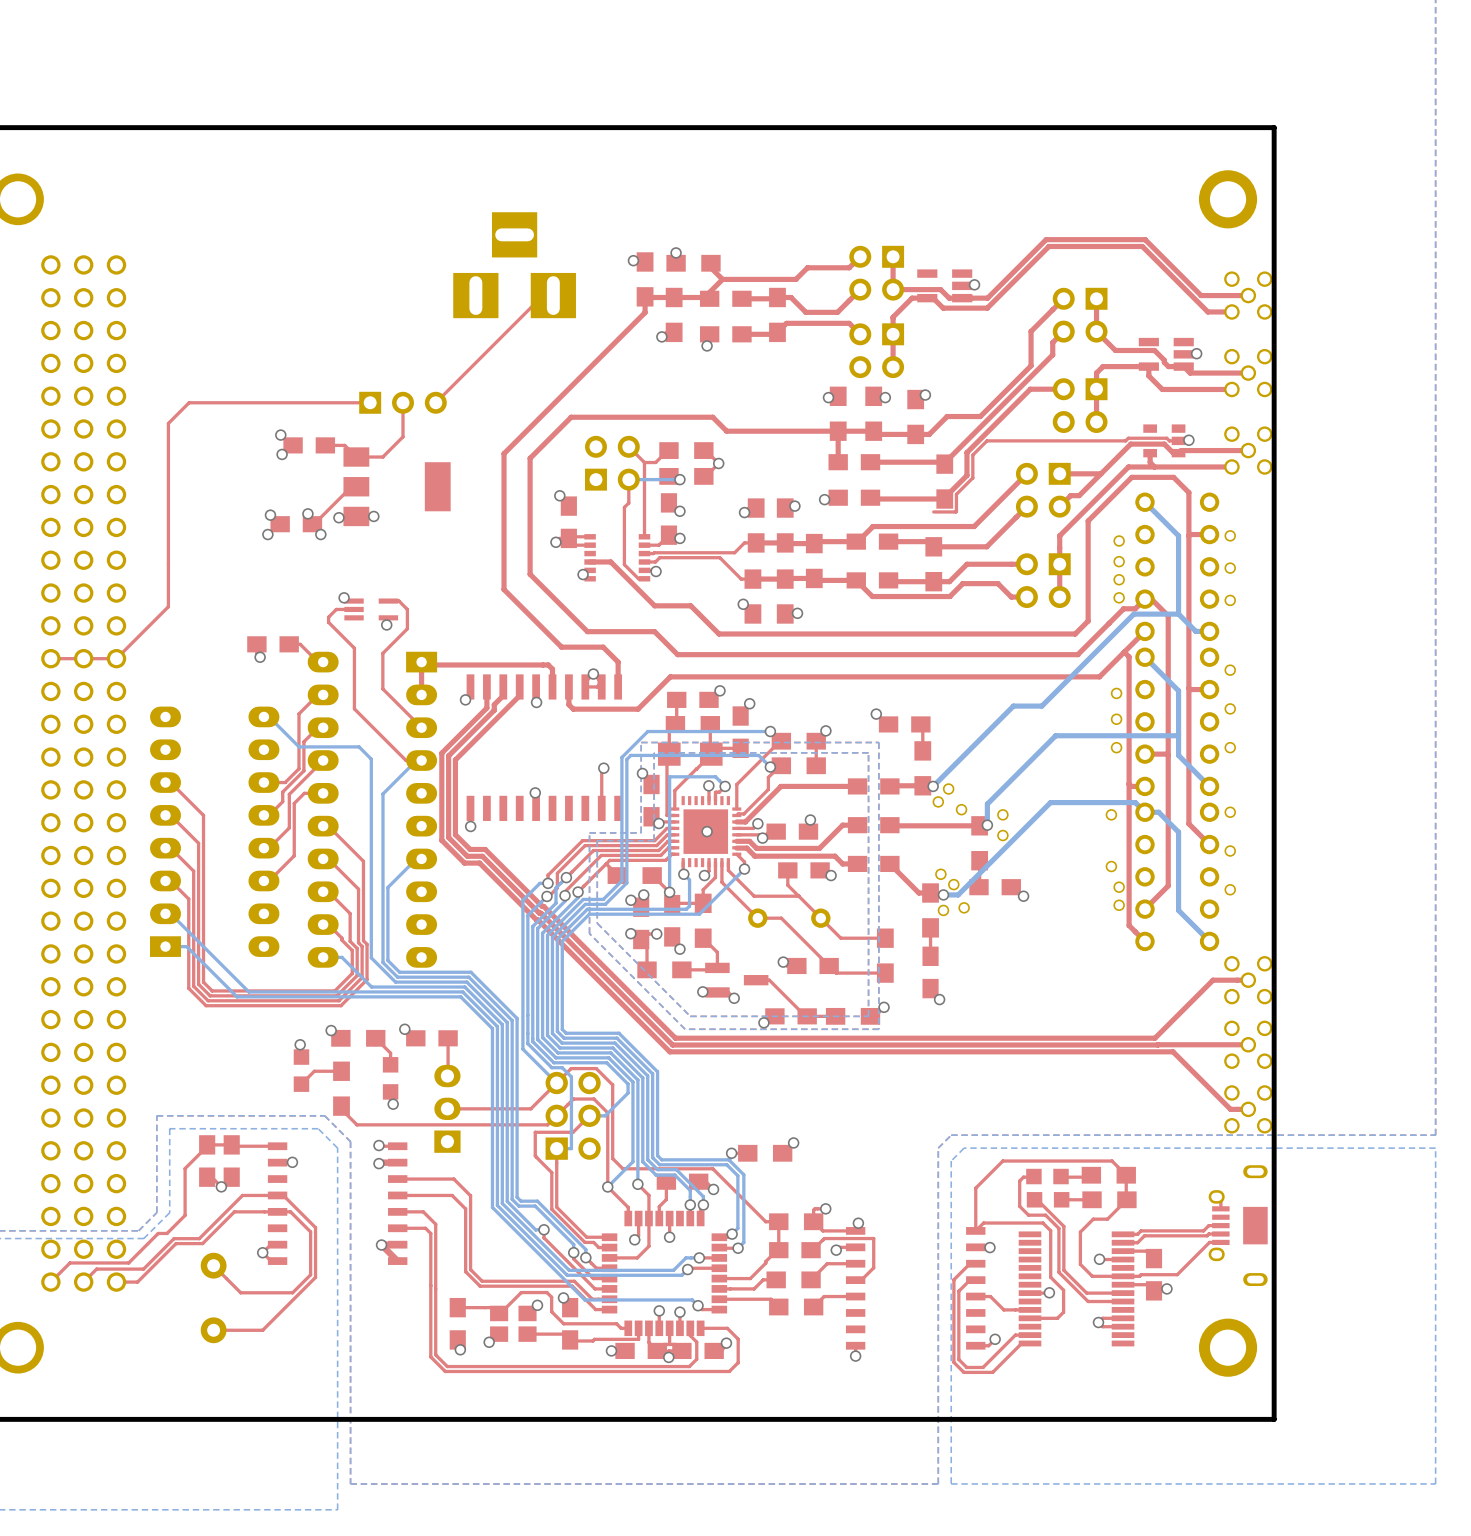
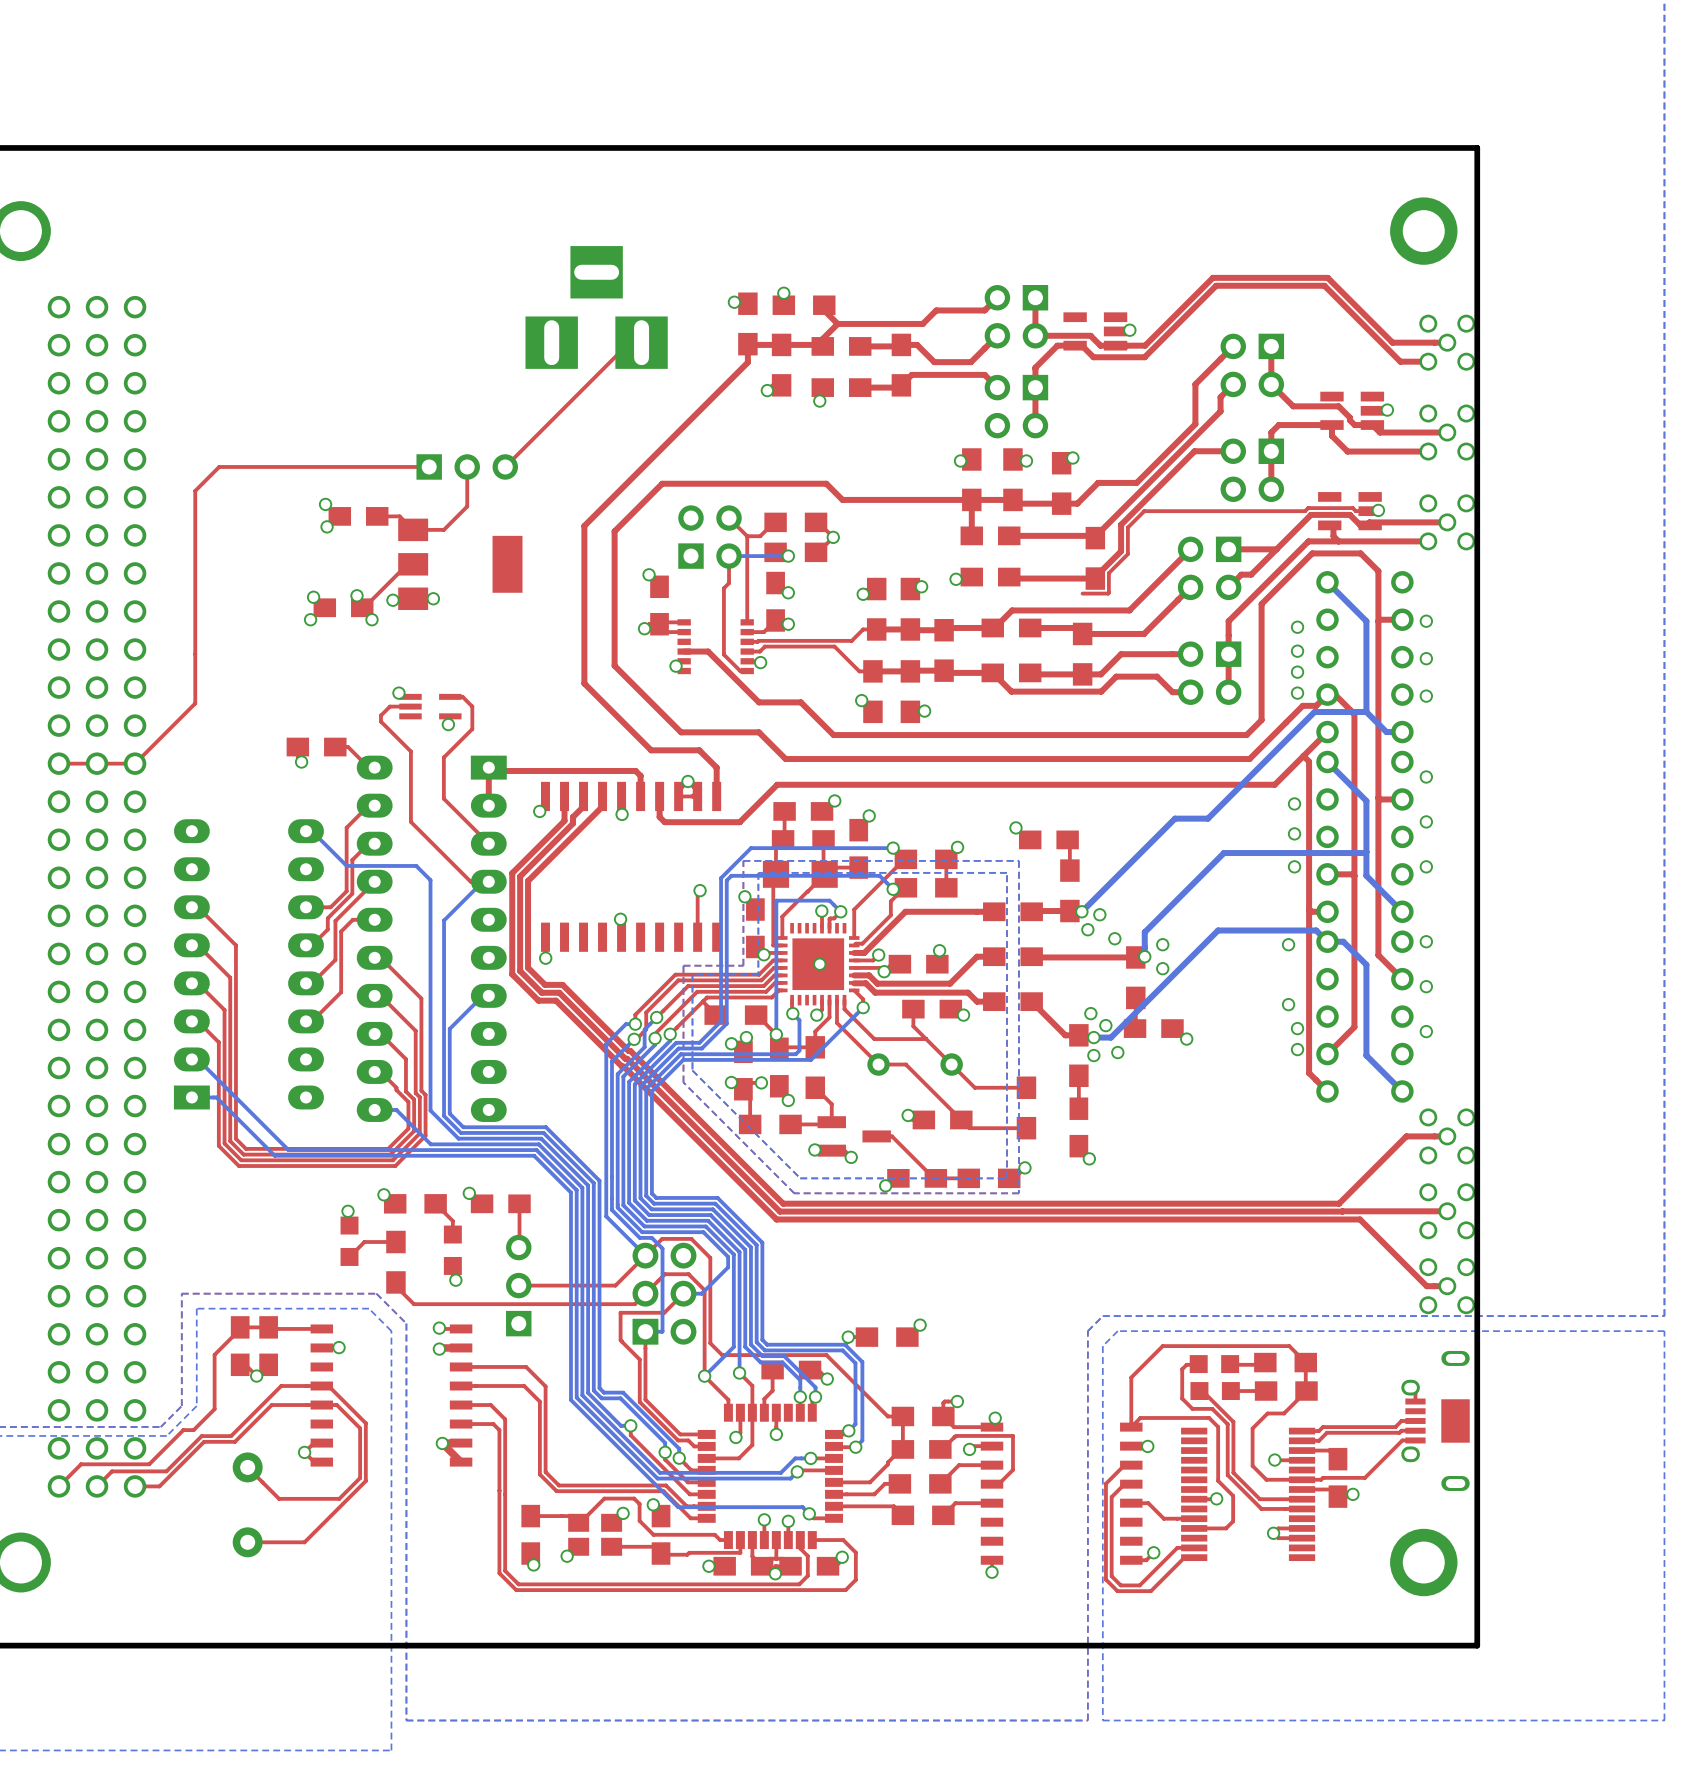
part footprint: [1143, 424, 1186, 458] -> [1318, 492, 1382, 531]
part footprint: [434, 1064, 461, 1153] -> [506, 1234, 532, 1337]

